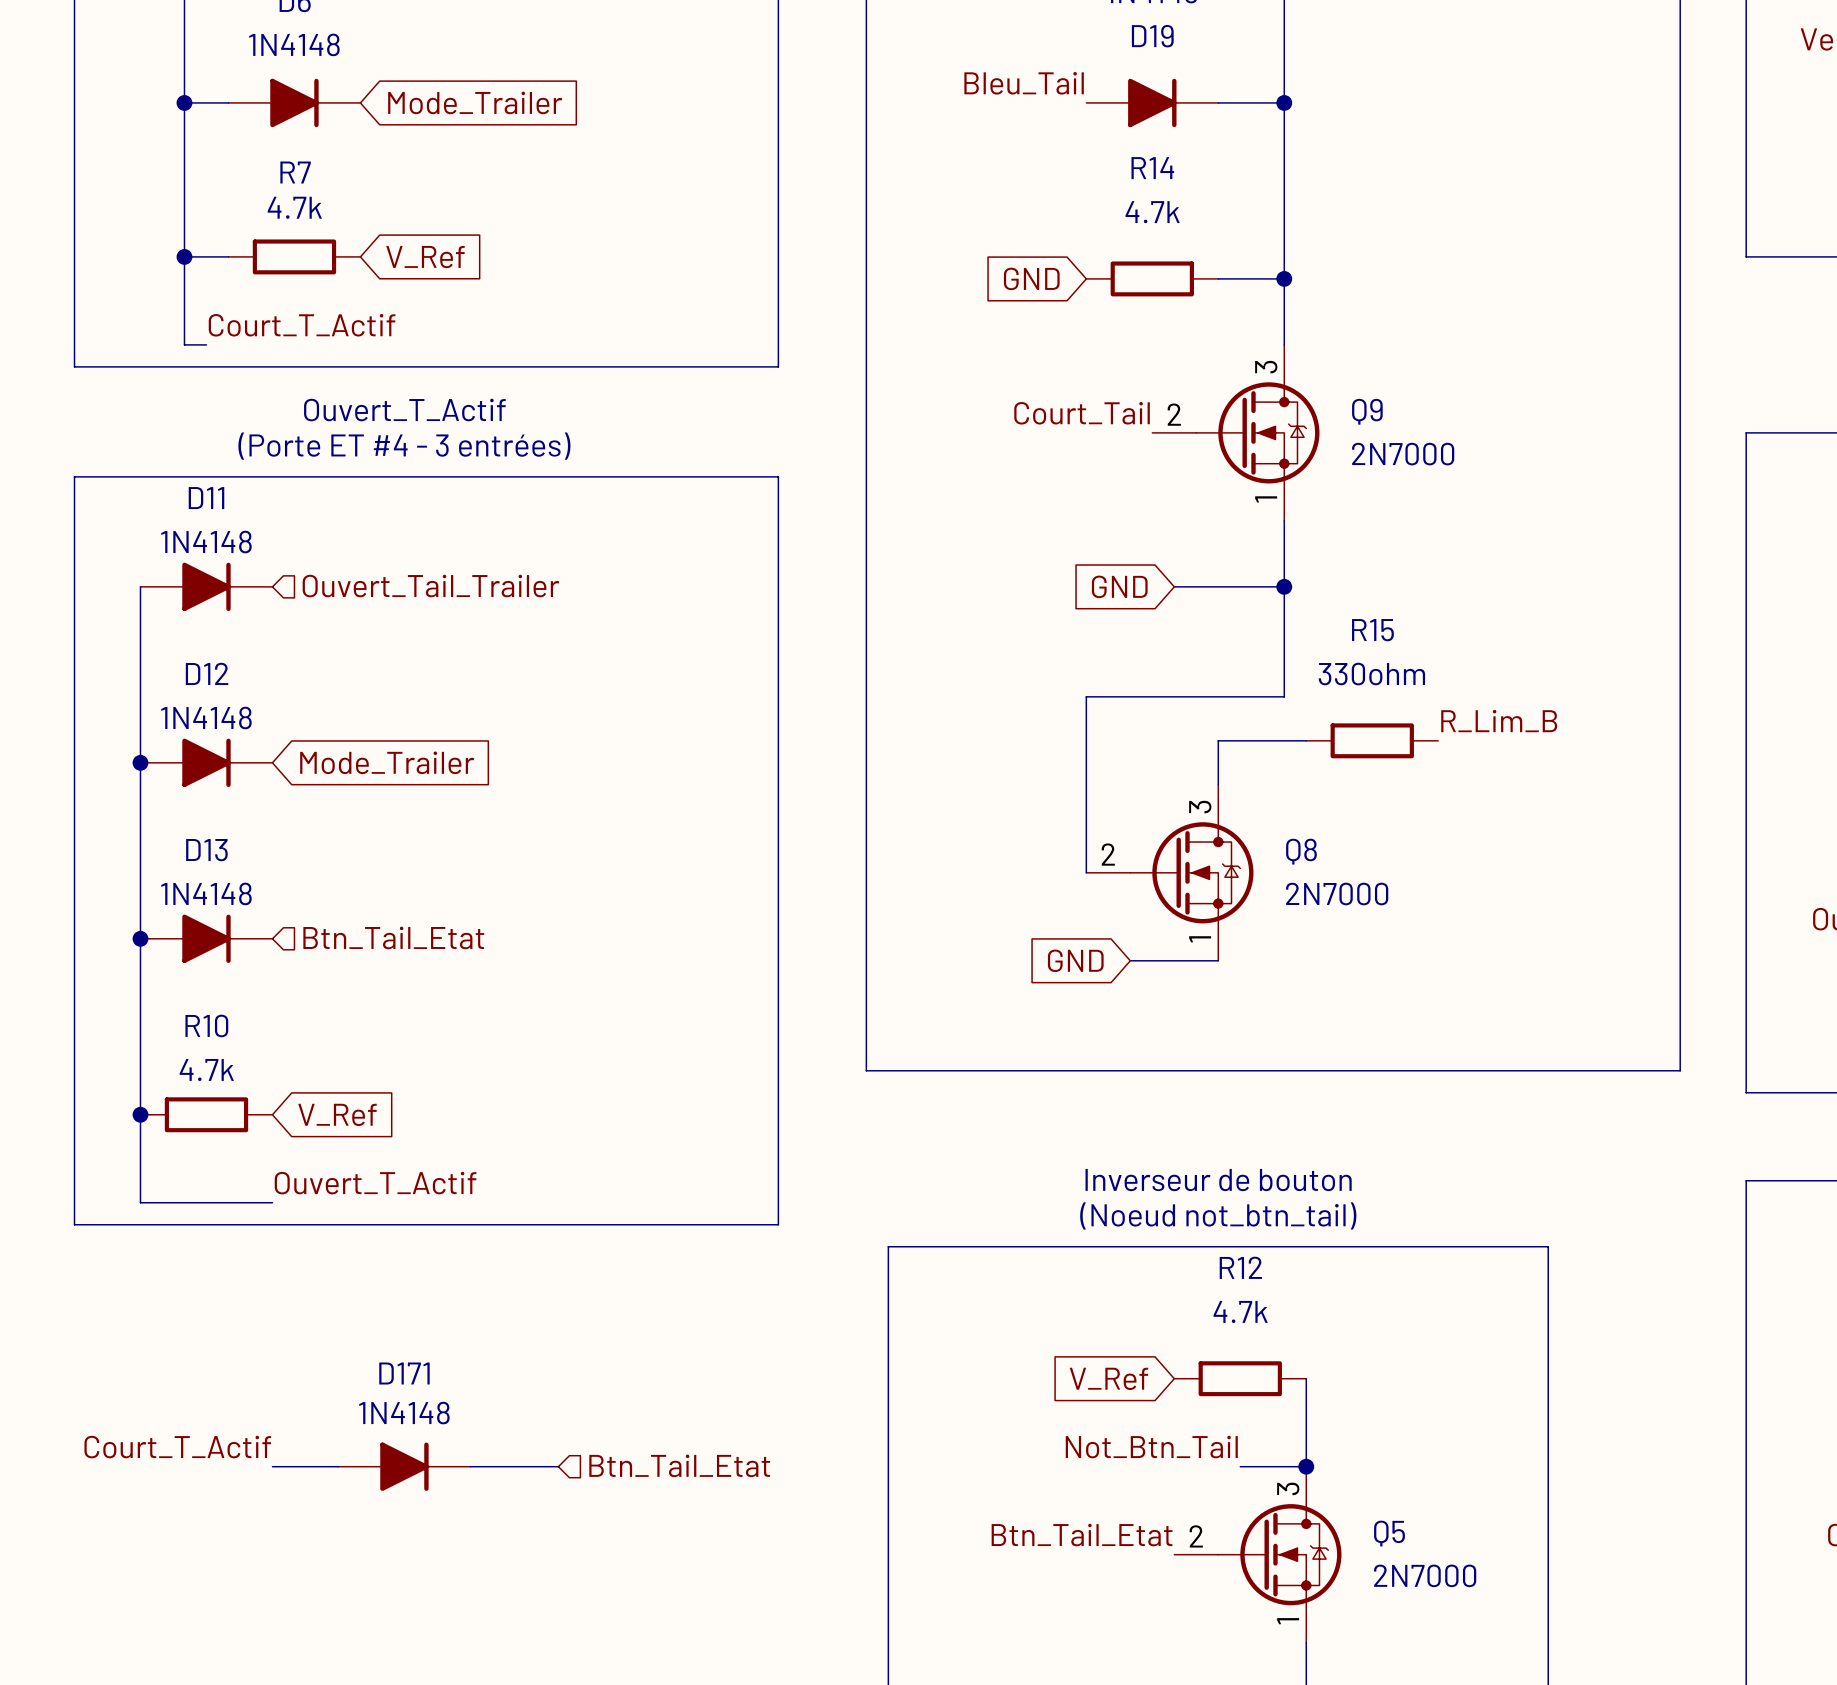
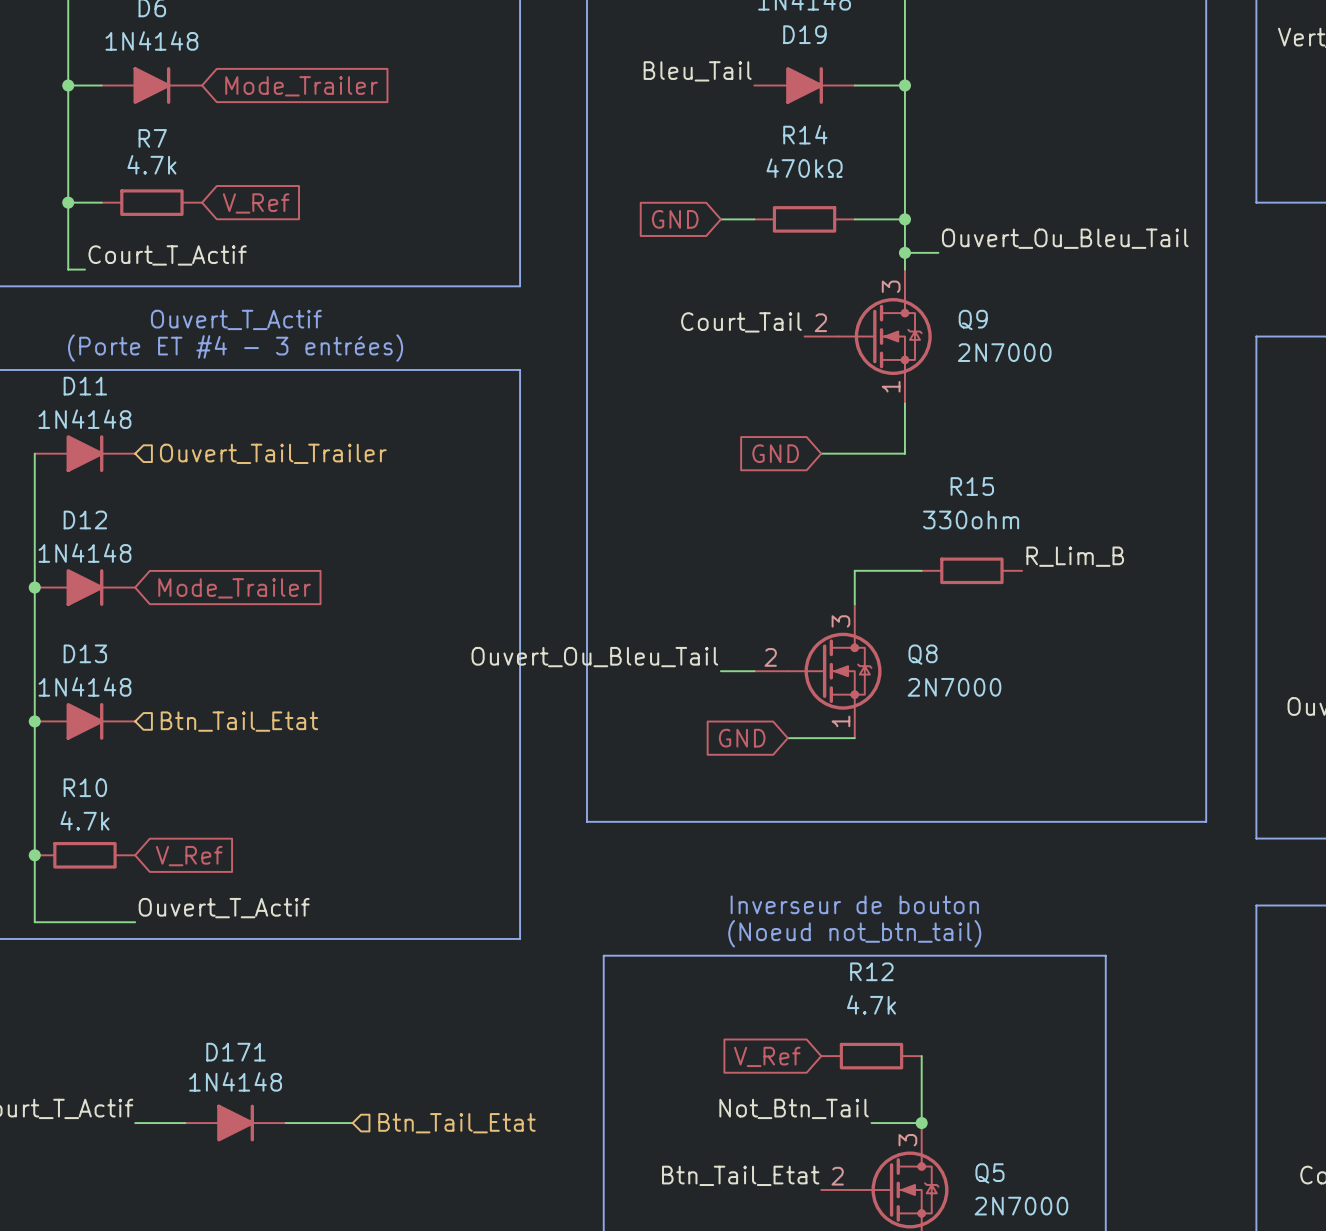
R14 value: 4.7k (1152, 212) -> 470kΩ (804, 168)
global label position: GND (1031, 278) -> GND (675, 219)
wire: none -> (720, 219) (754, 219)
label: none -> Ouvert_Ou_Bleu_Tail (1065, 238)
wire: none -> (904, 252) (938, 252)
junction: none -> (904, 252)
wire: (1284, 586) (1284, 696) (1086, 696) (1086, 872) -> (720, 671) (754, 671)
junction: (1284, 586) -> none
label: none -> Ouvert_Ou_Bleu_Tail (594, 657)

